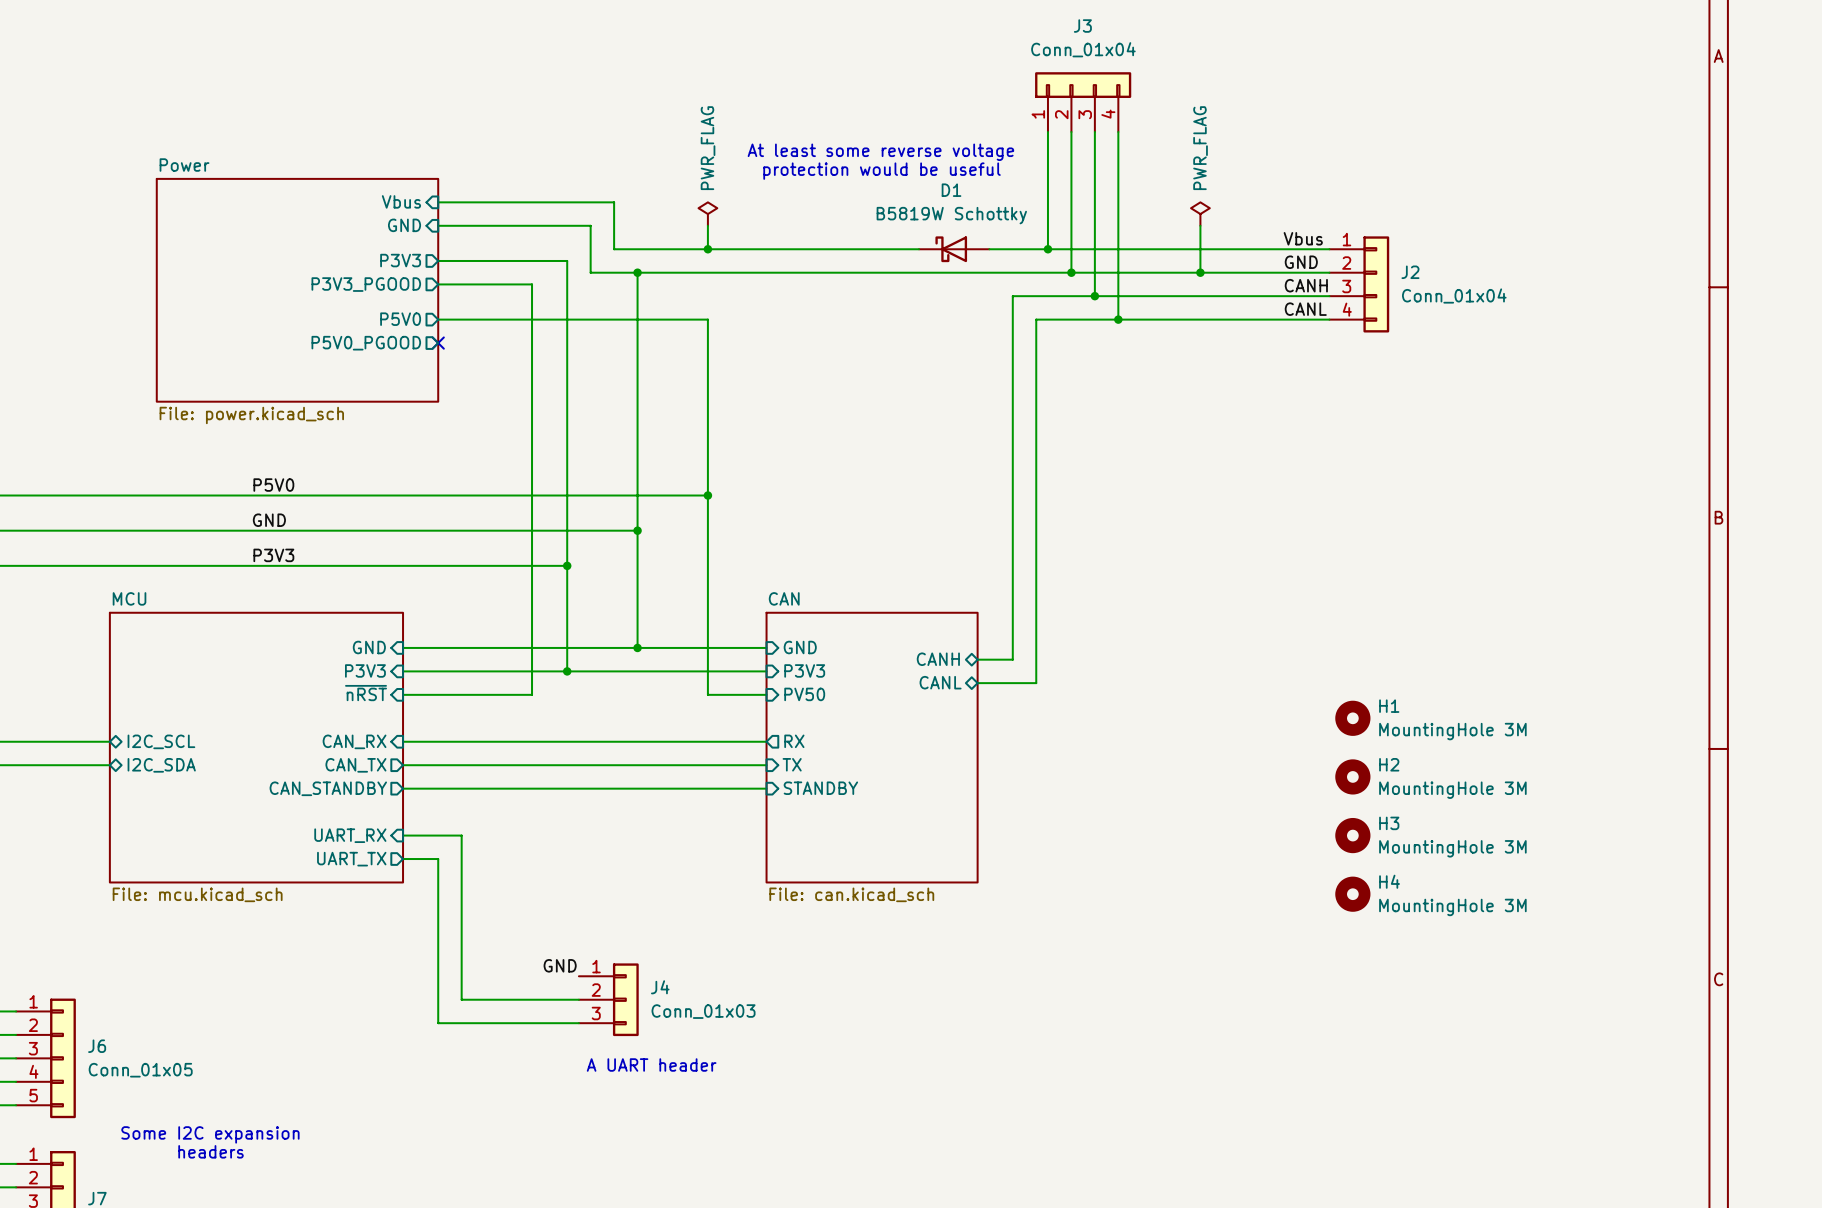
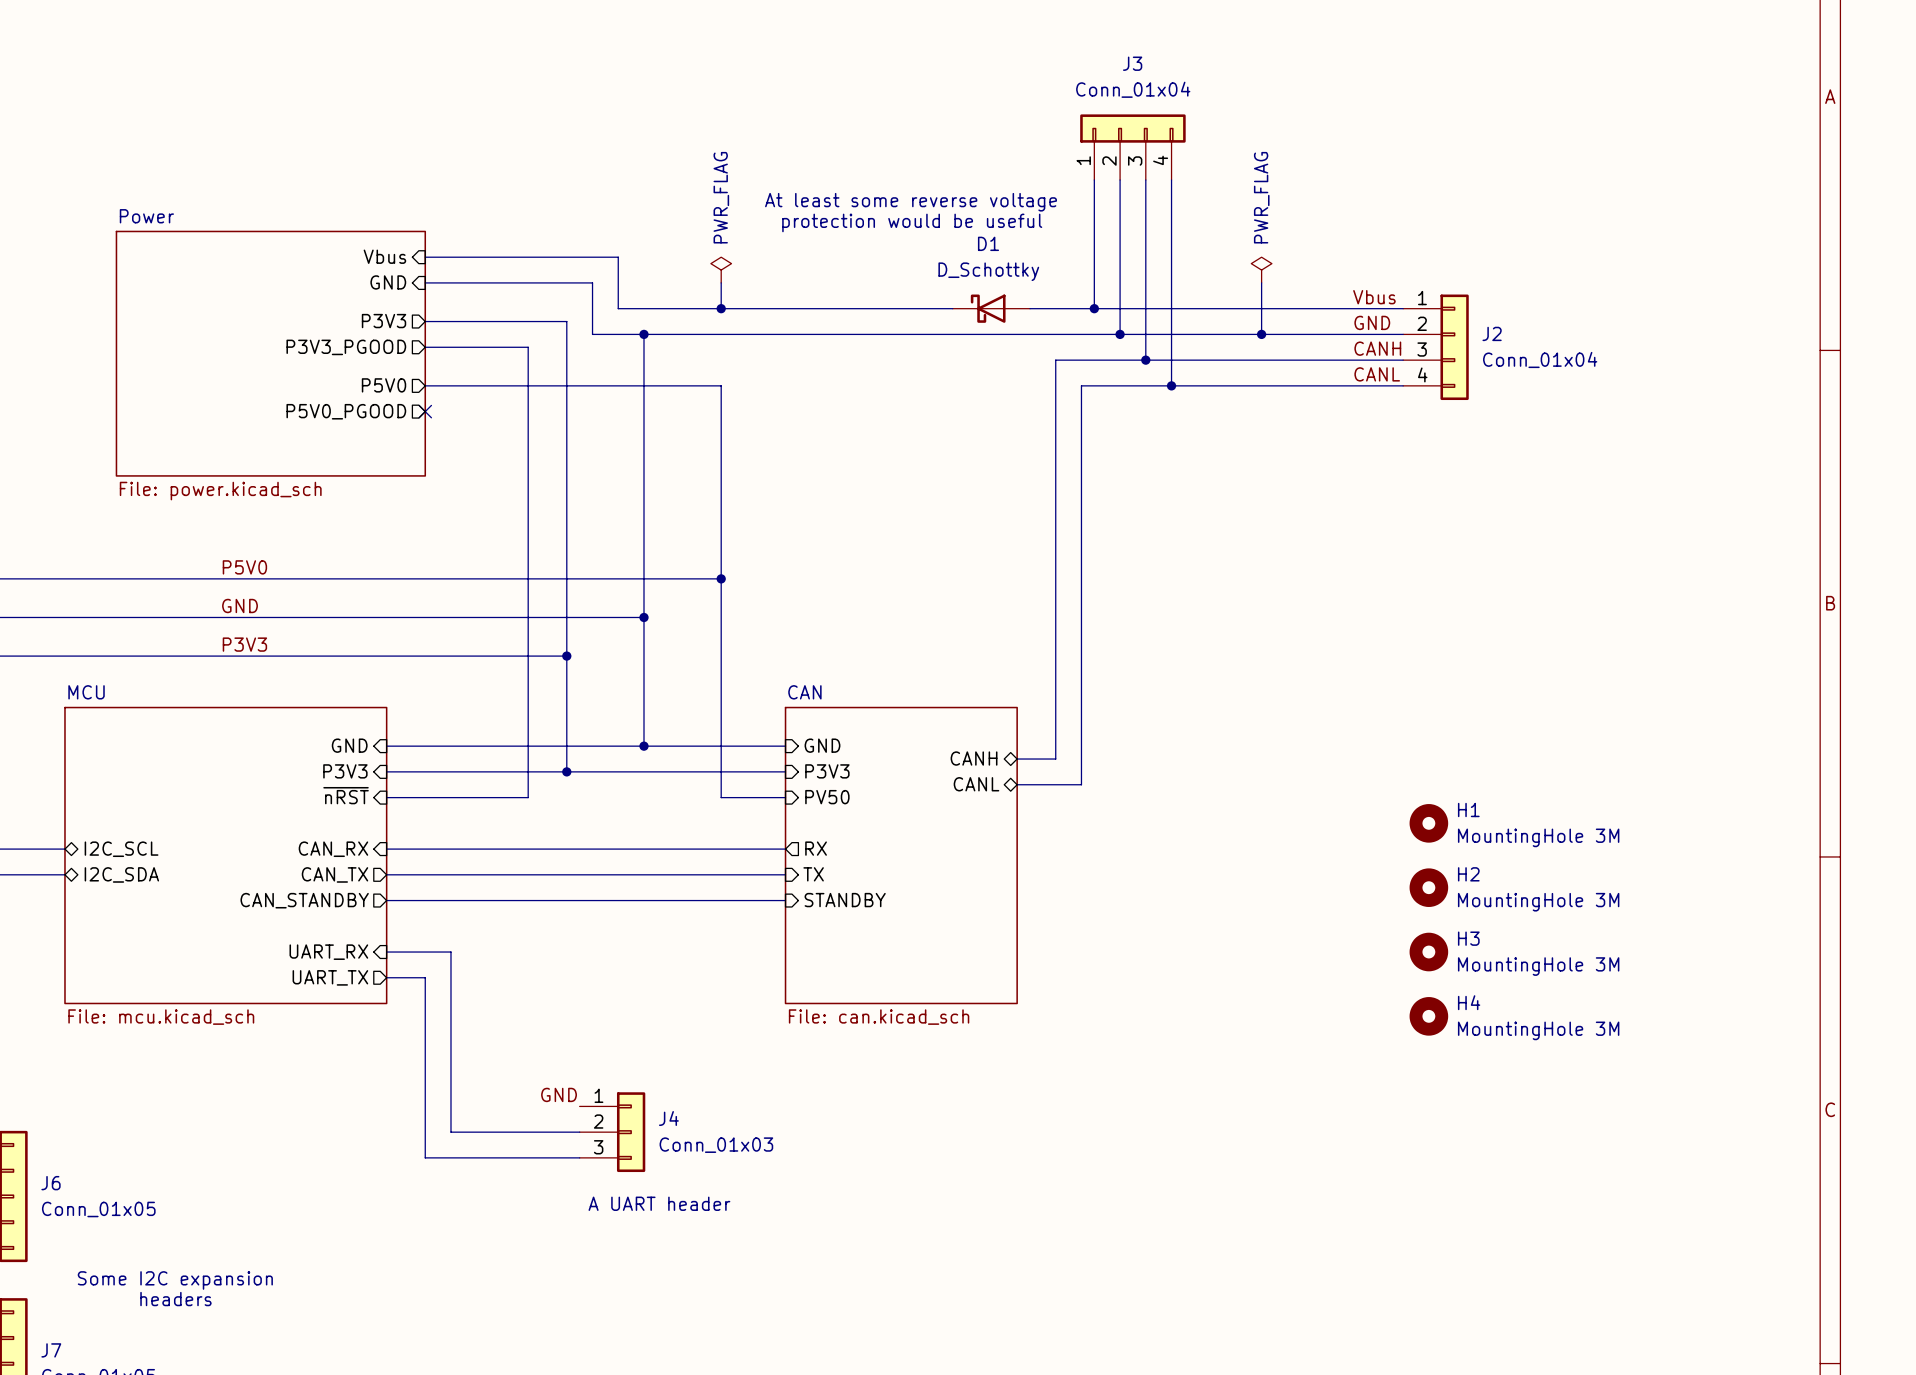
D1 value: B5819W Schottky (951, 215) -> D_Schottky (988, 271)

